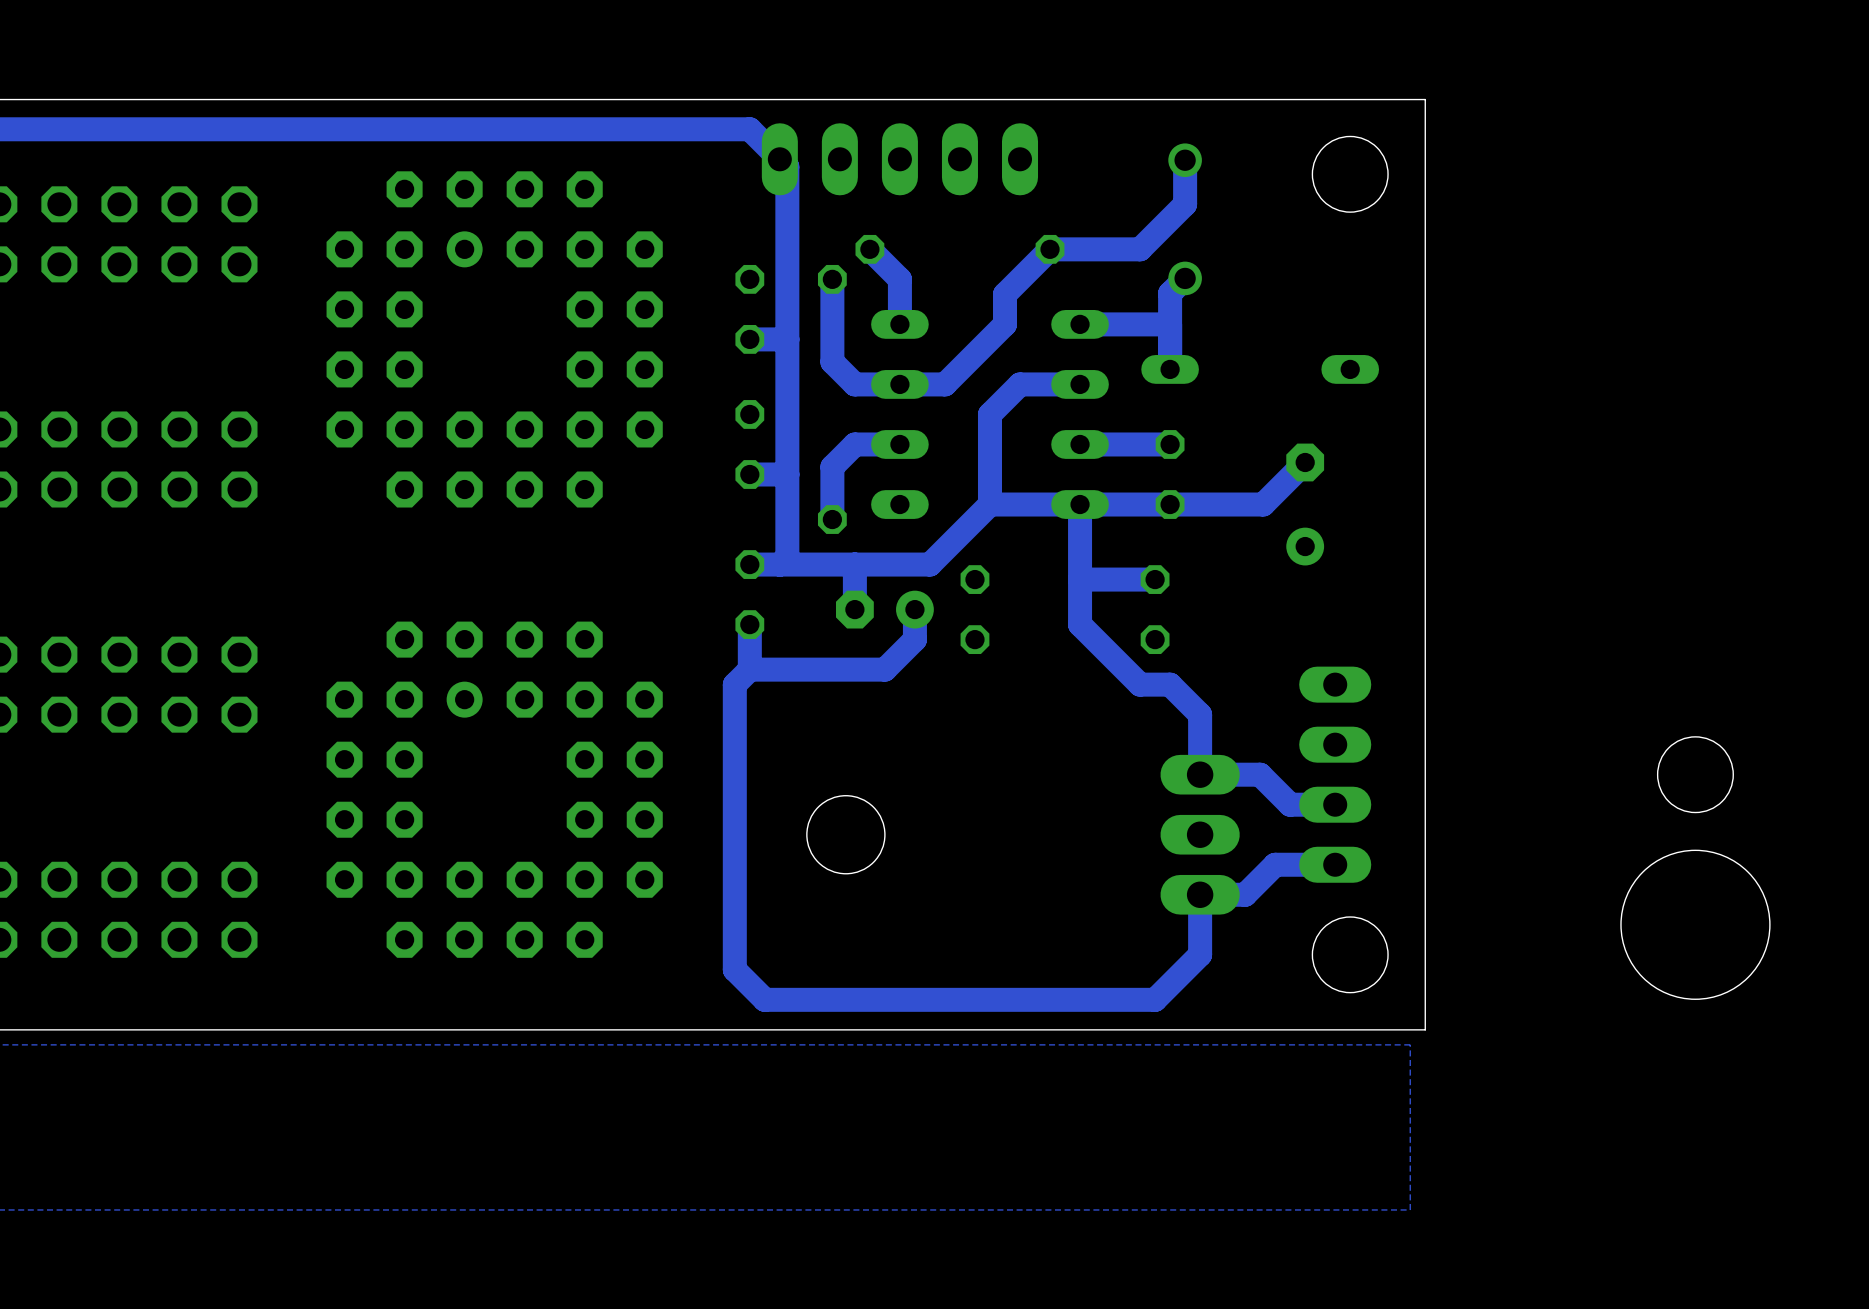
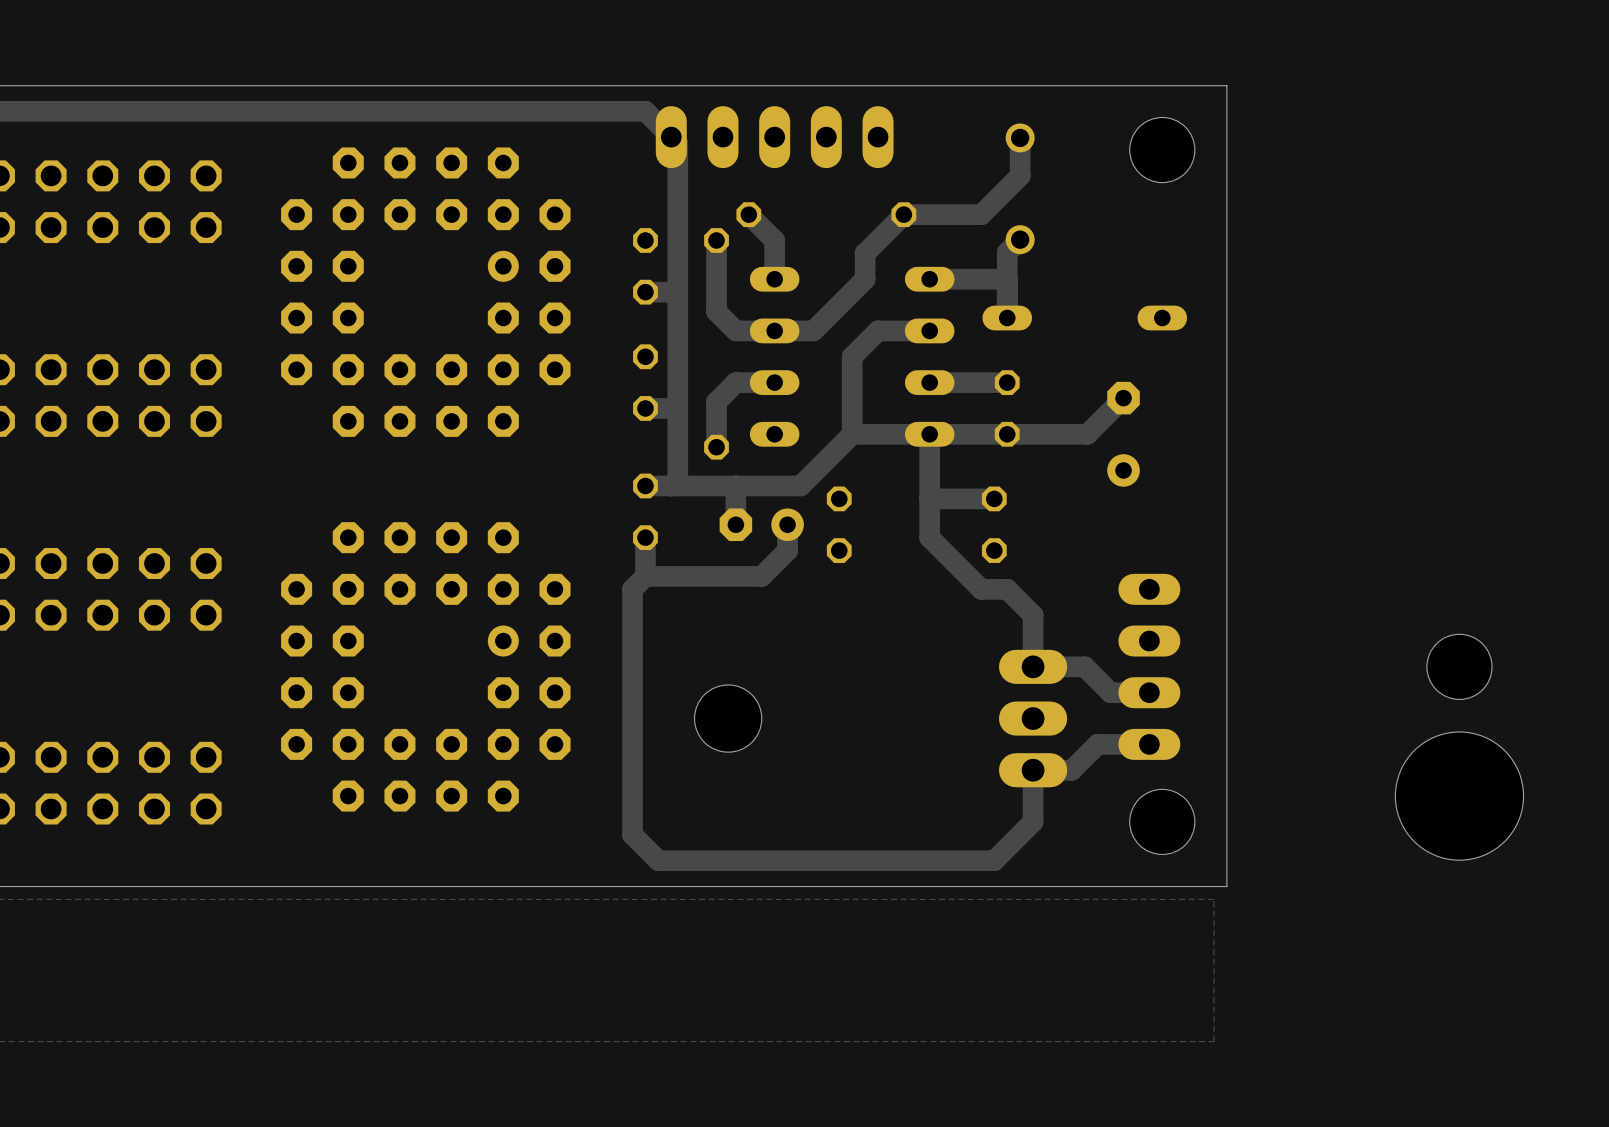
part rotation: 0° (494, 339) -> 90° clockwise (425, 292)
part rotation: 0° (494, 789) -> 90° clockwise (425, 666)

